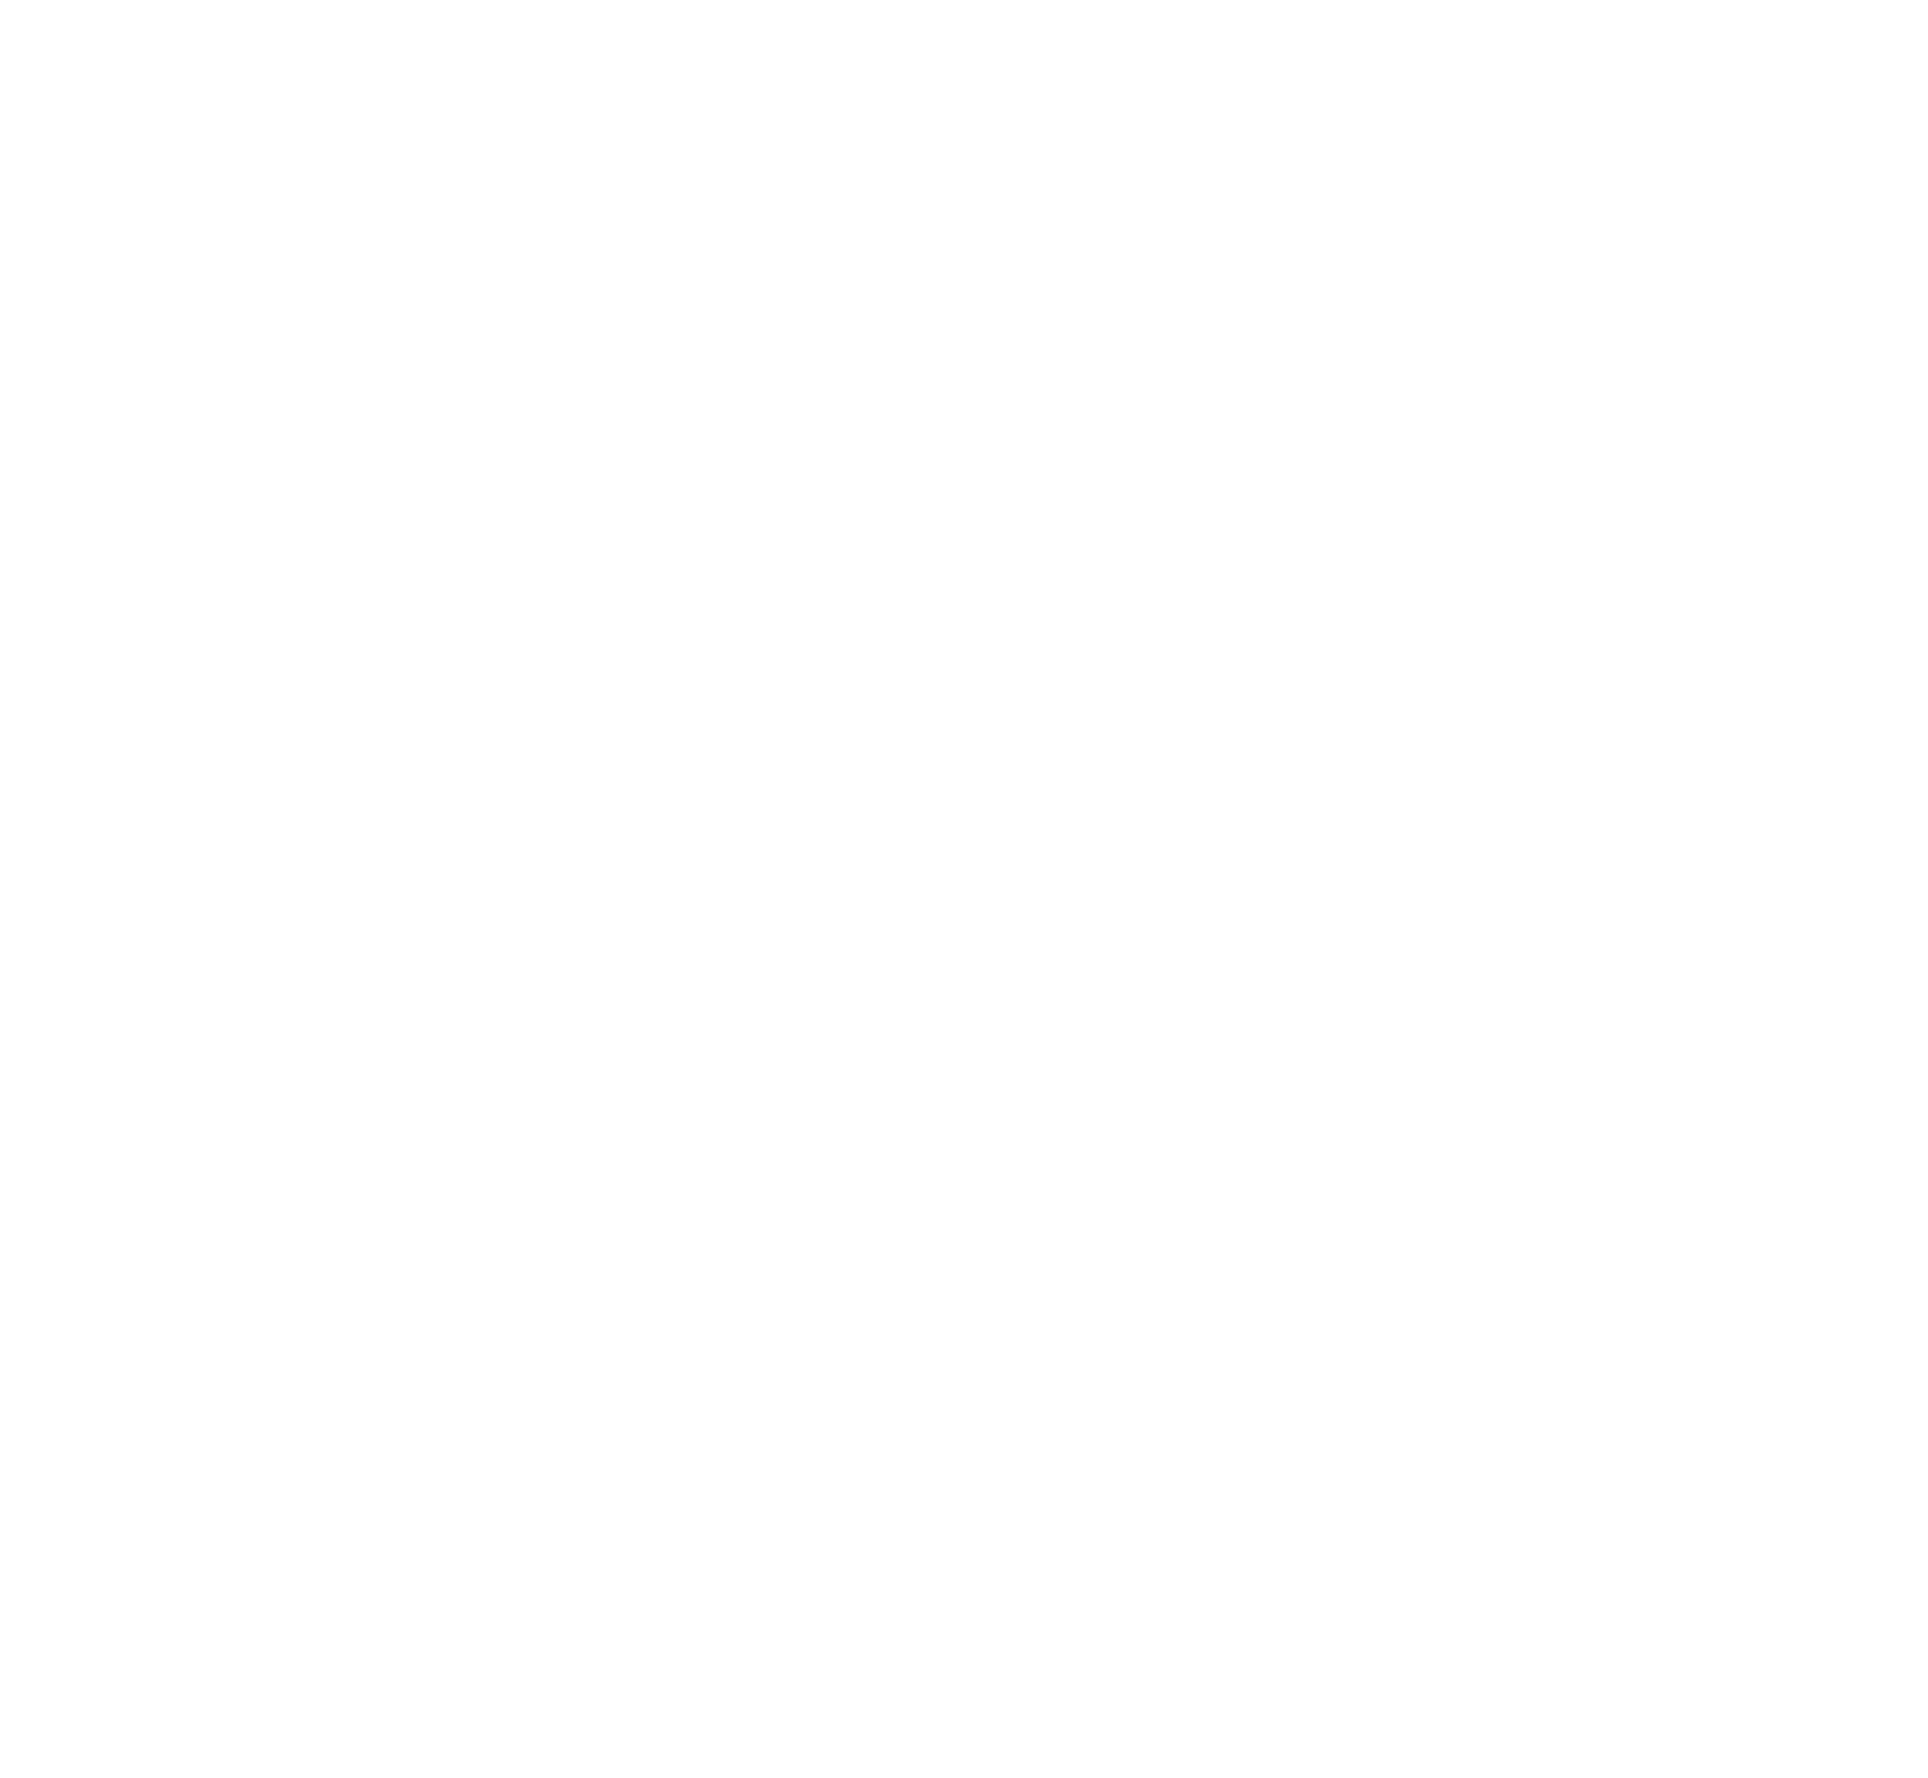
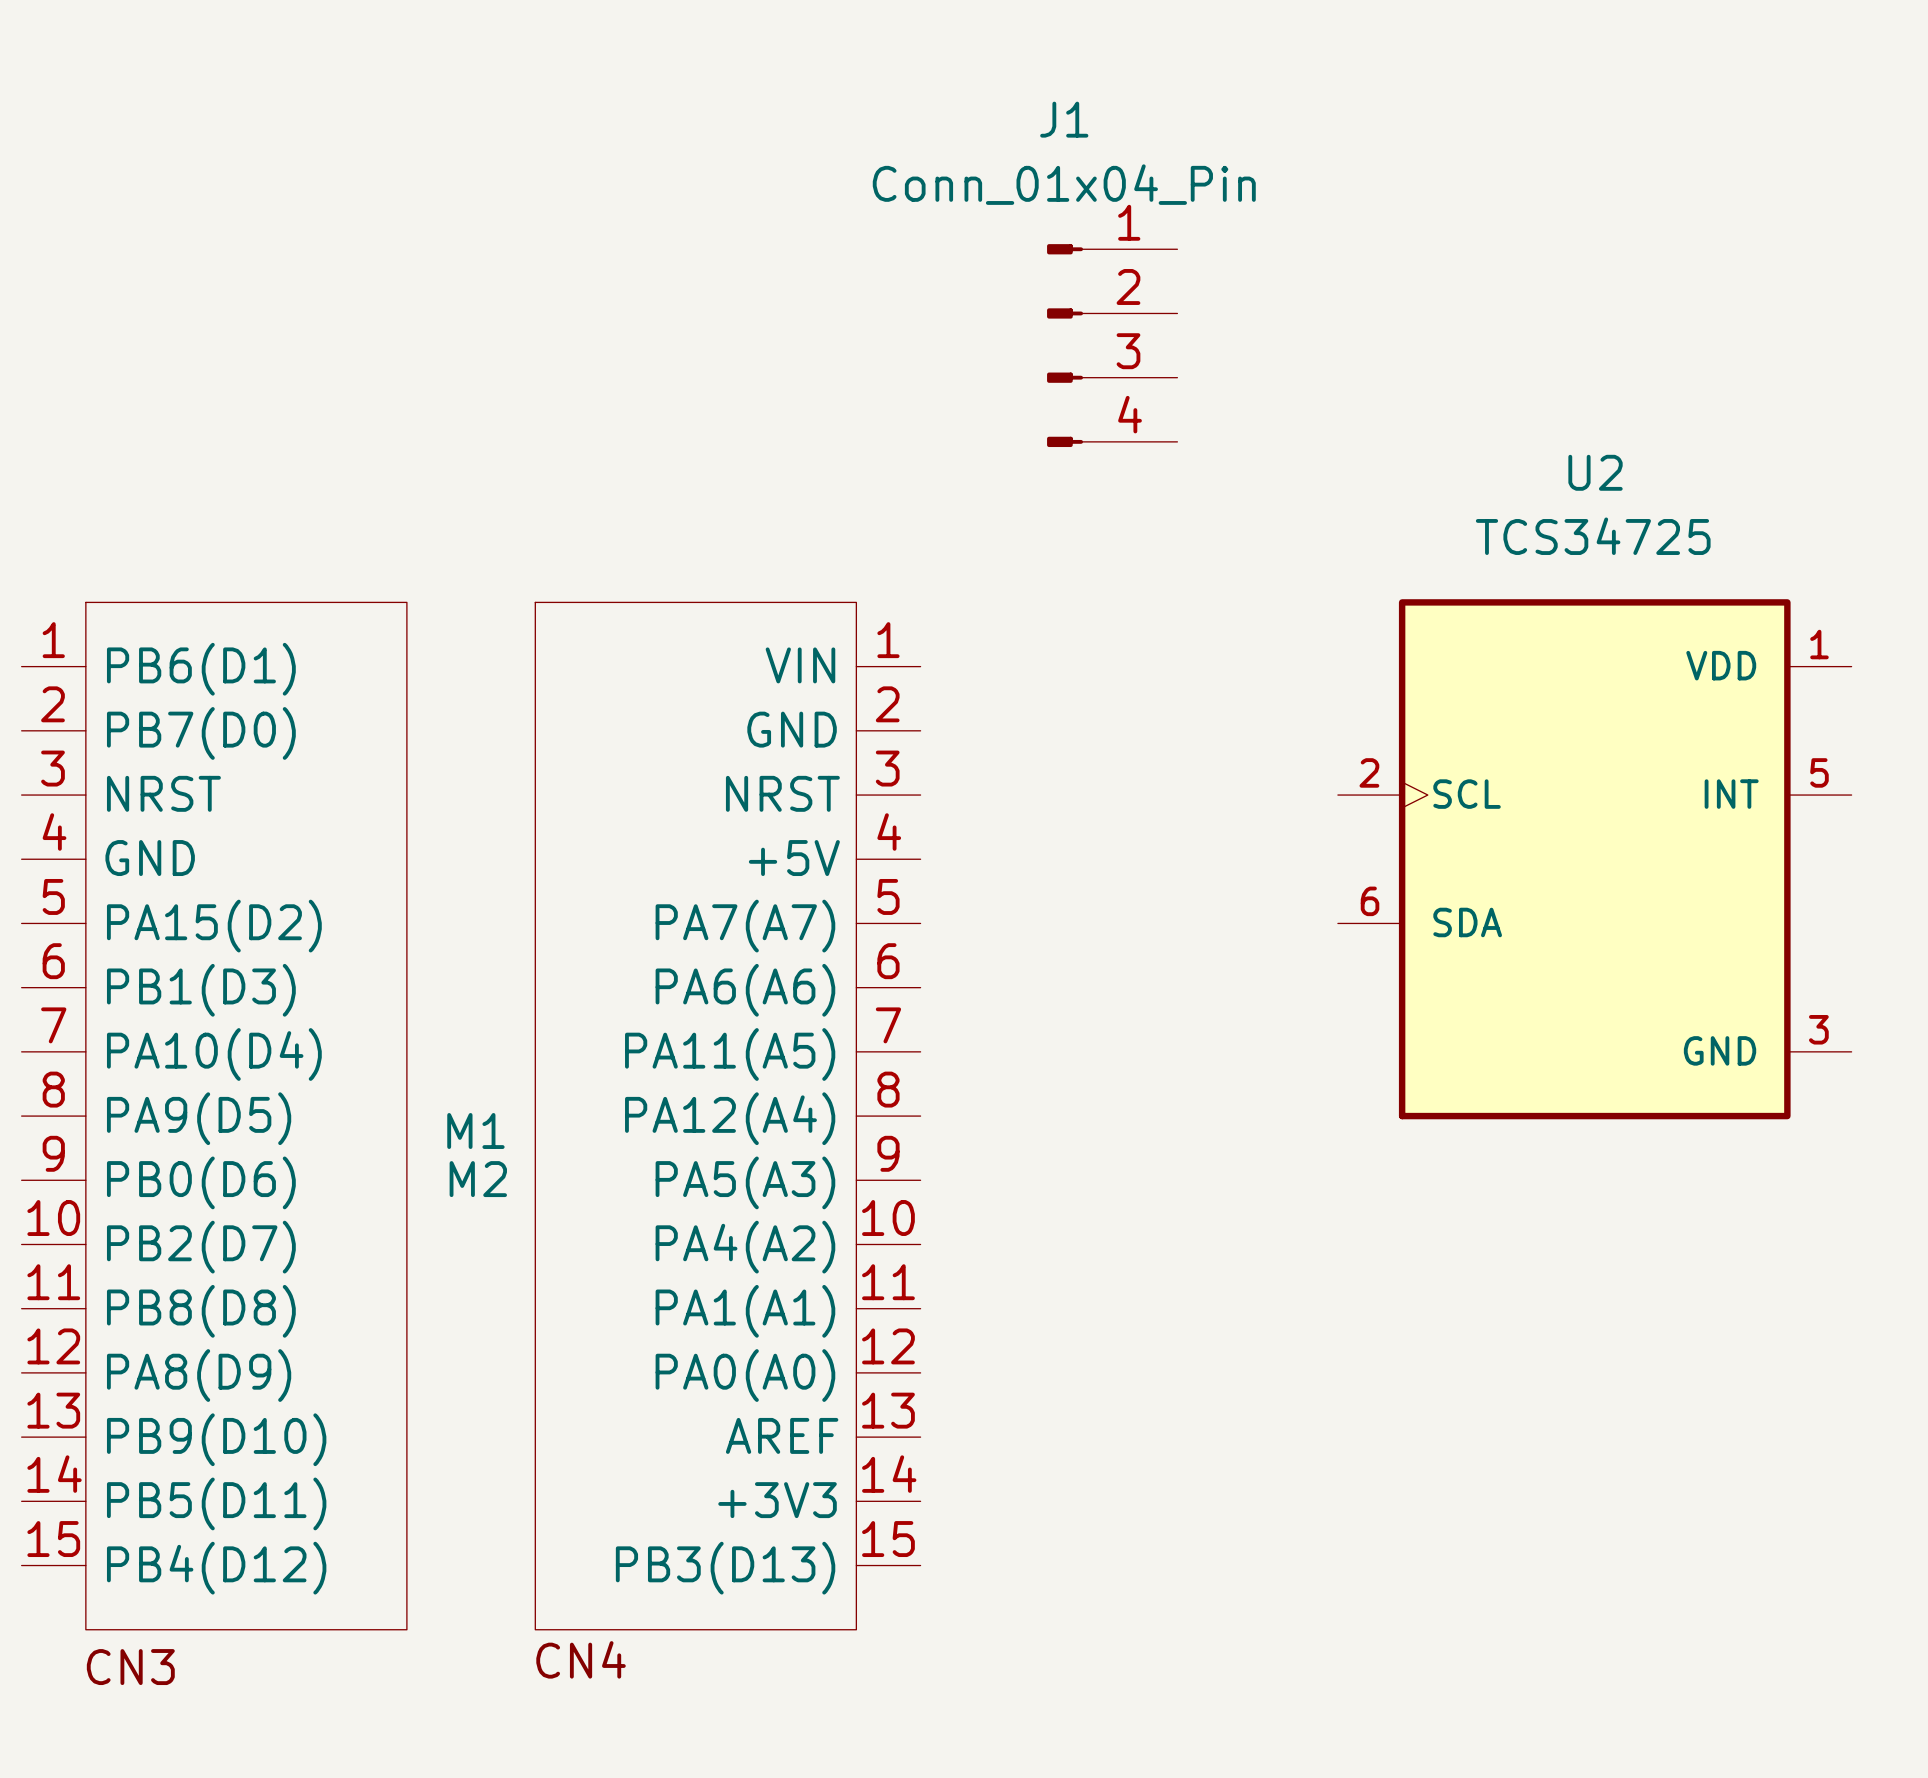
J1: none -> Conn_01x04_Pin (1112, 345)
U2: none -> TCS34725 (1594, 859)
M1: none -> (214, 1116)
M2: none -> (727, 1116)

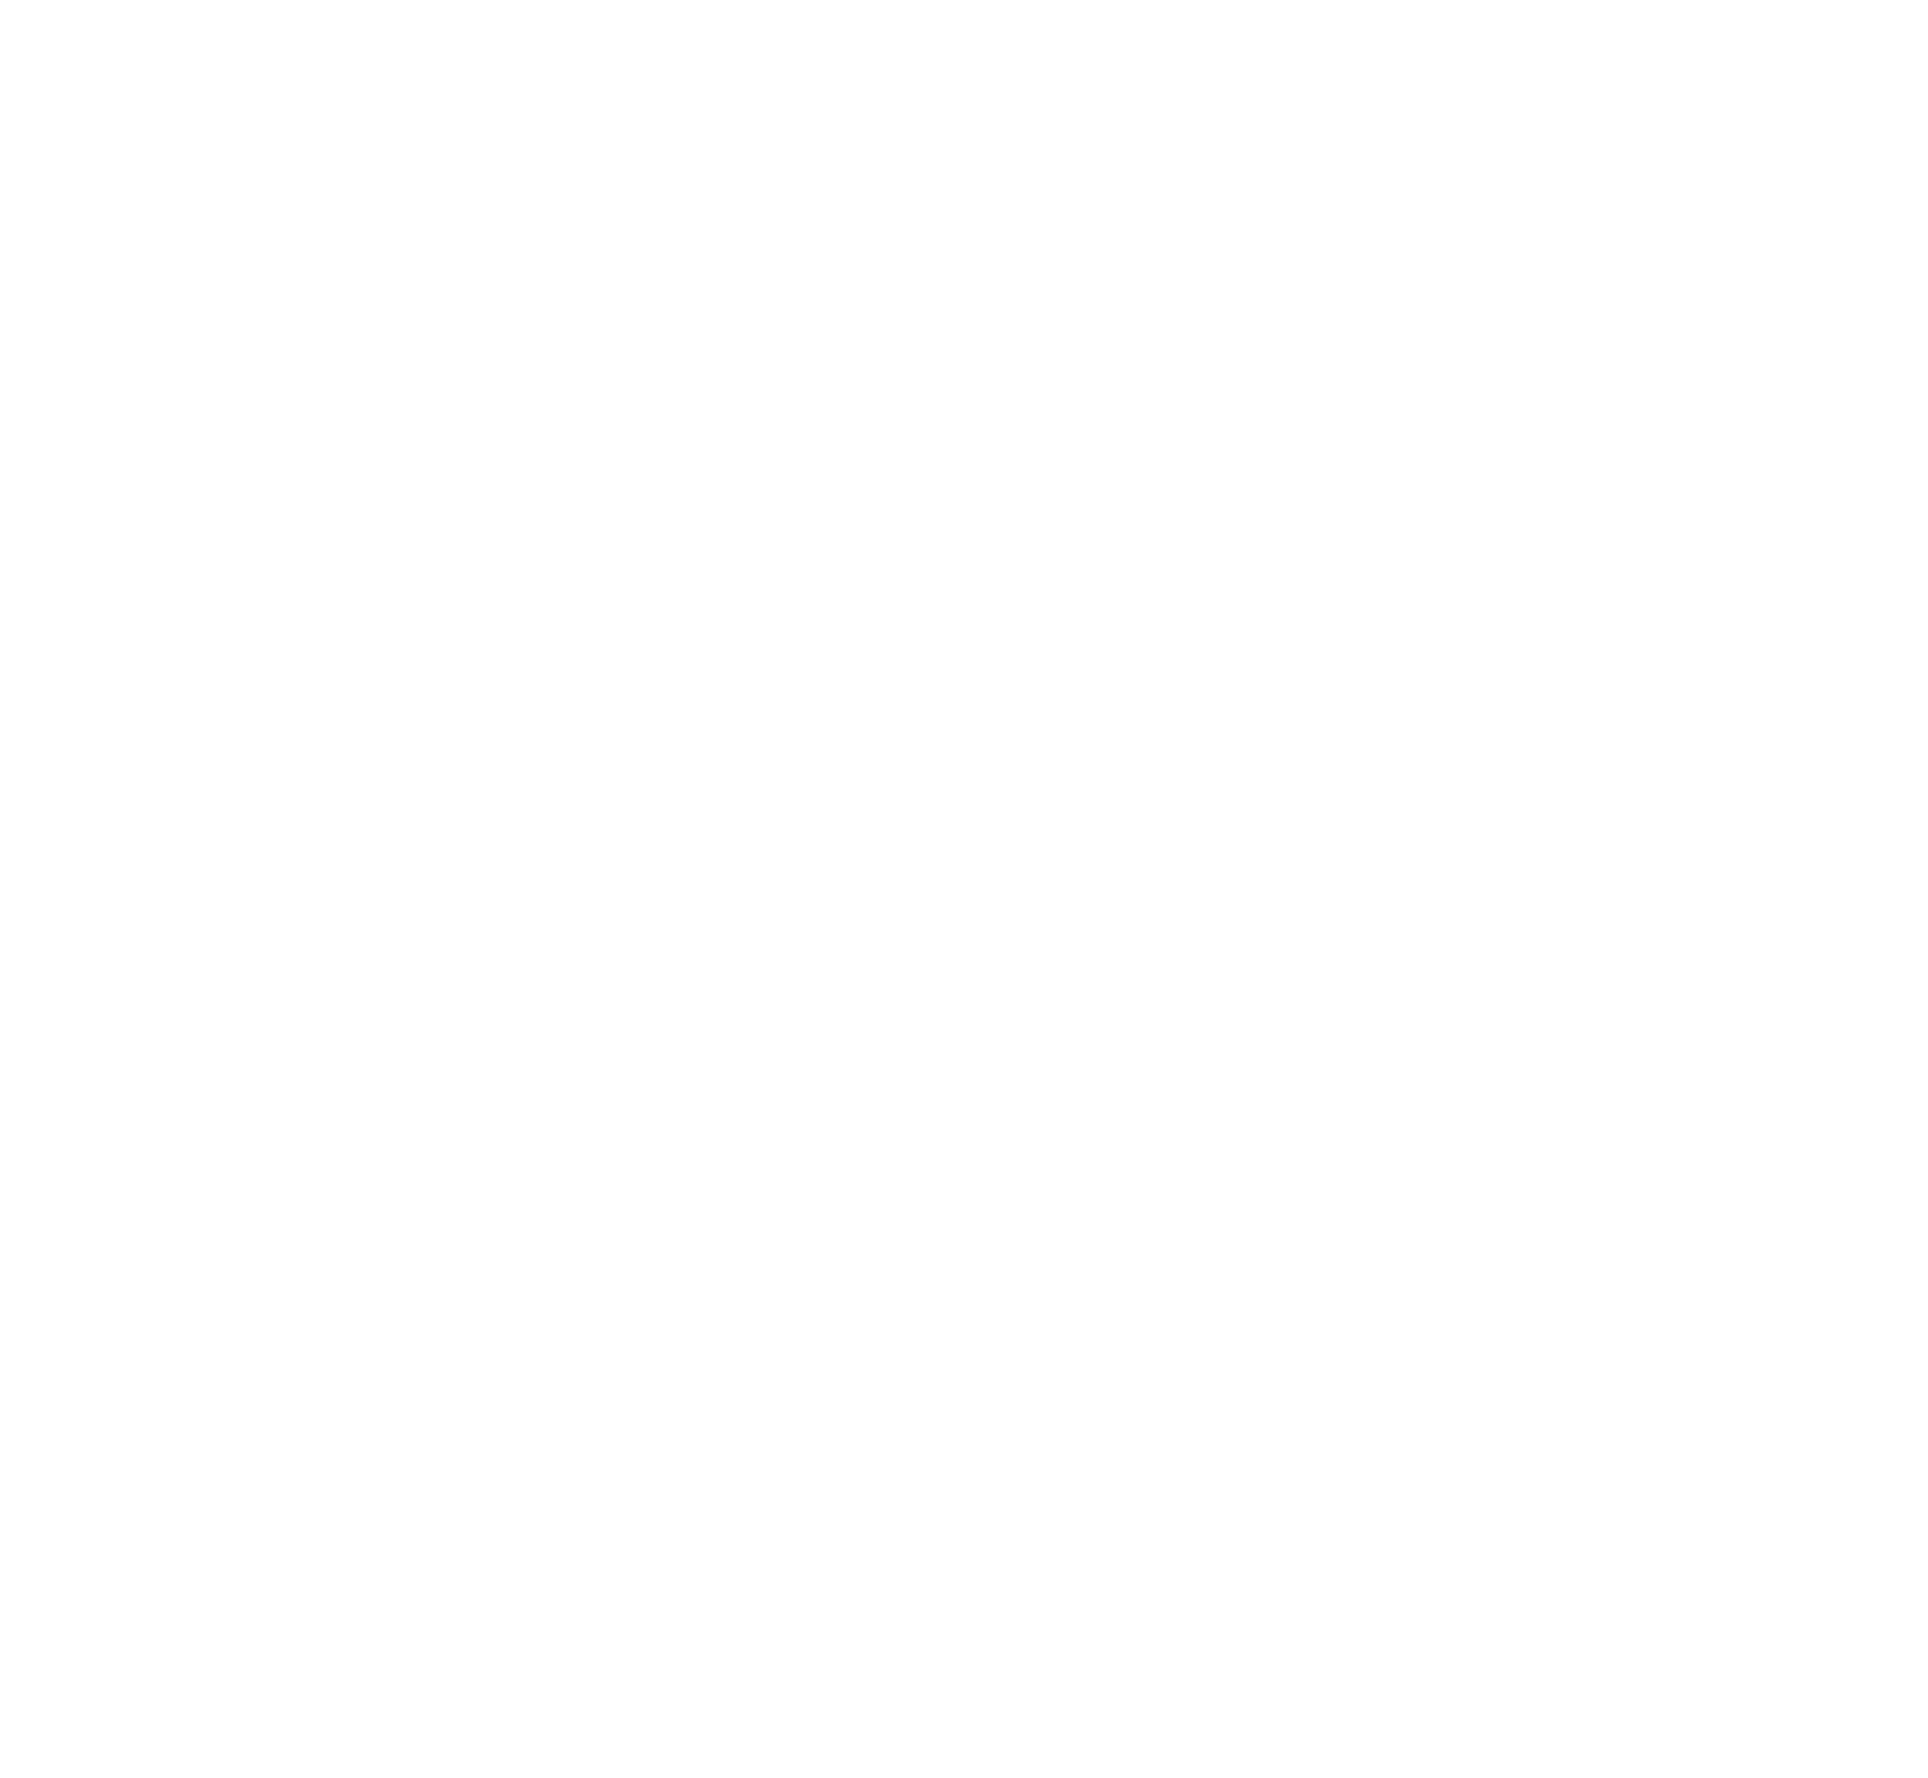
J1: Conn_01x04_Pin (1112, 345) -> none
U2: TCS34725 (1594, 859) -> none
M1: (214, 1116) -> none
M2: (727, 1116) -> none

